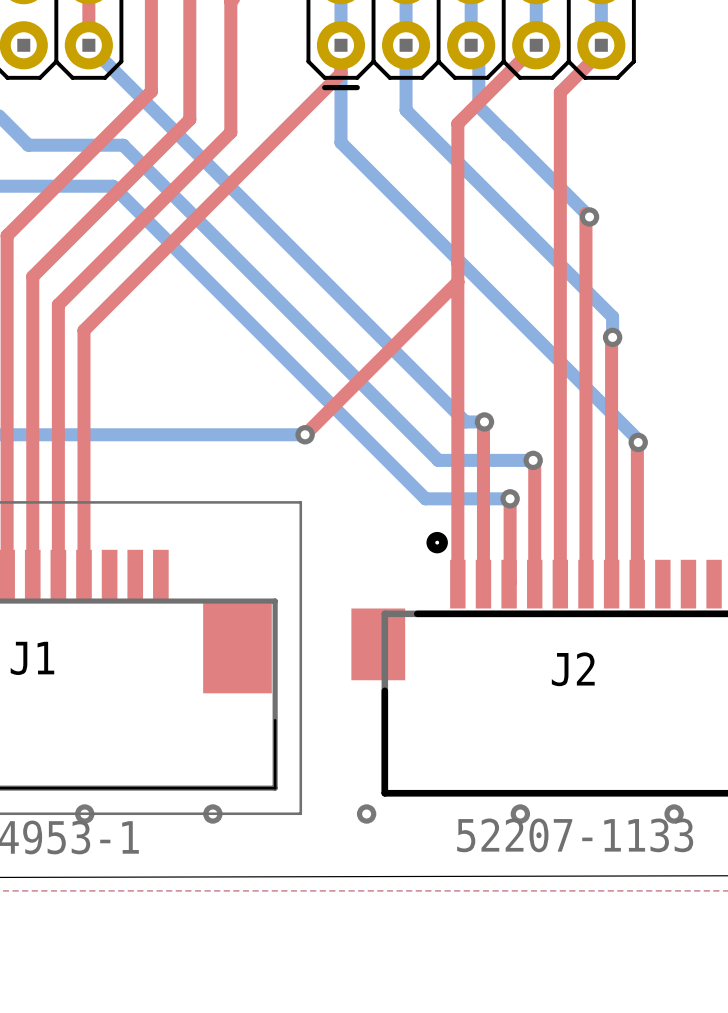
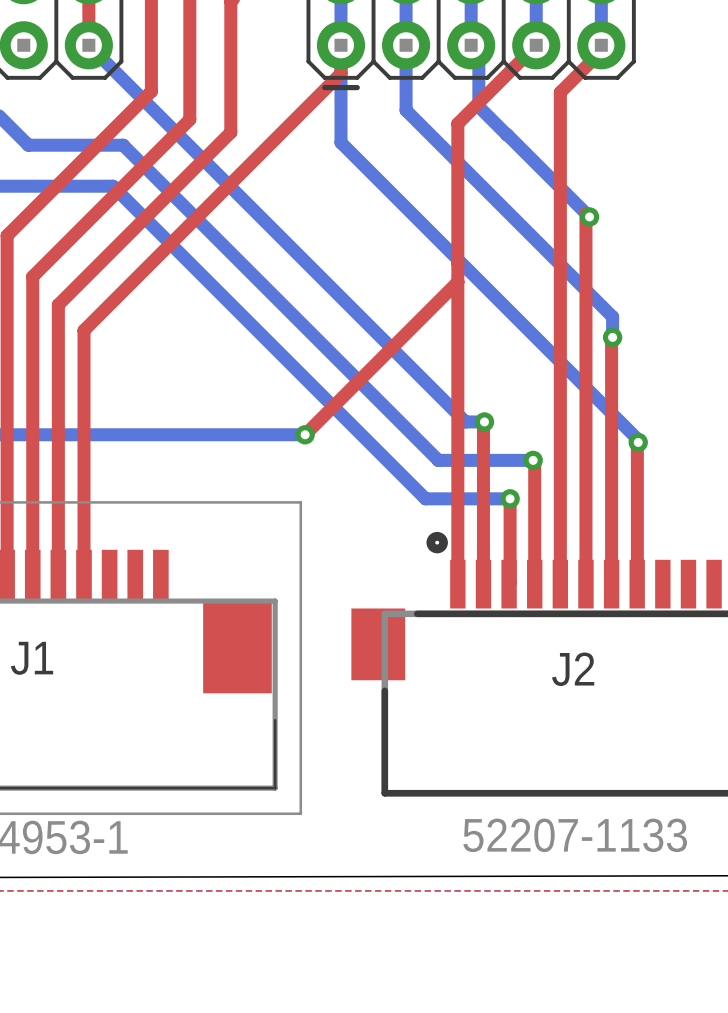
via: (84, 814) -> none
via: (212, 814) -> none
via: (366, 814) -> none
via: (520, 814) -> none
via: (674, 814) -> none

